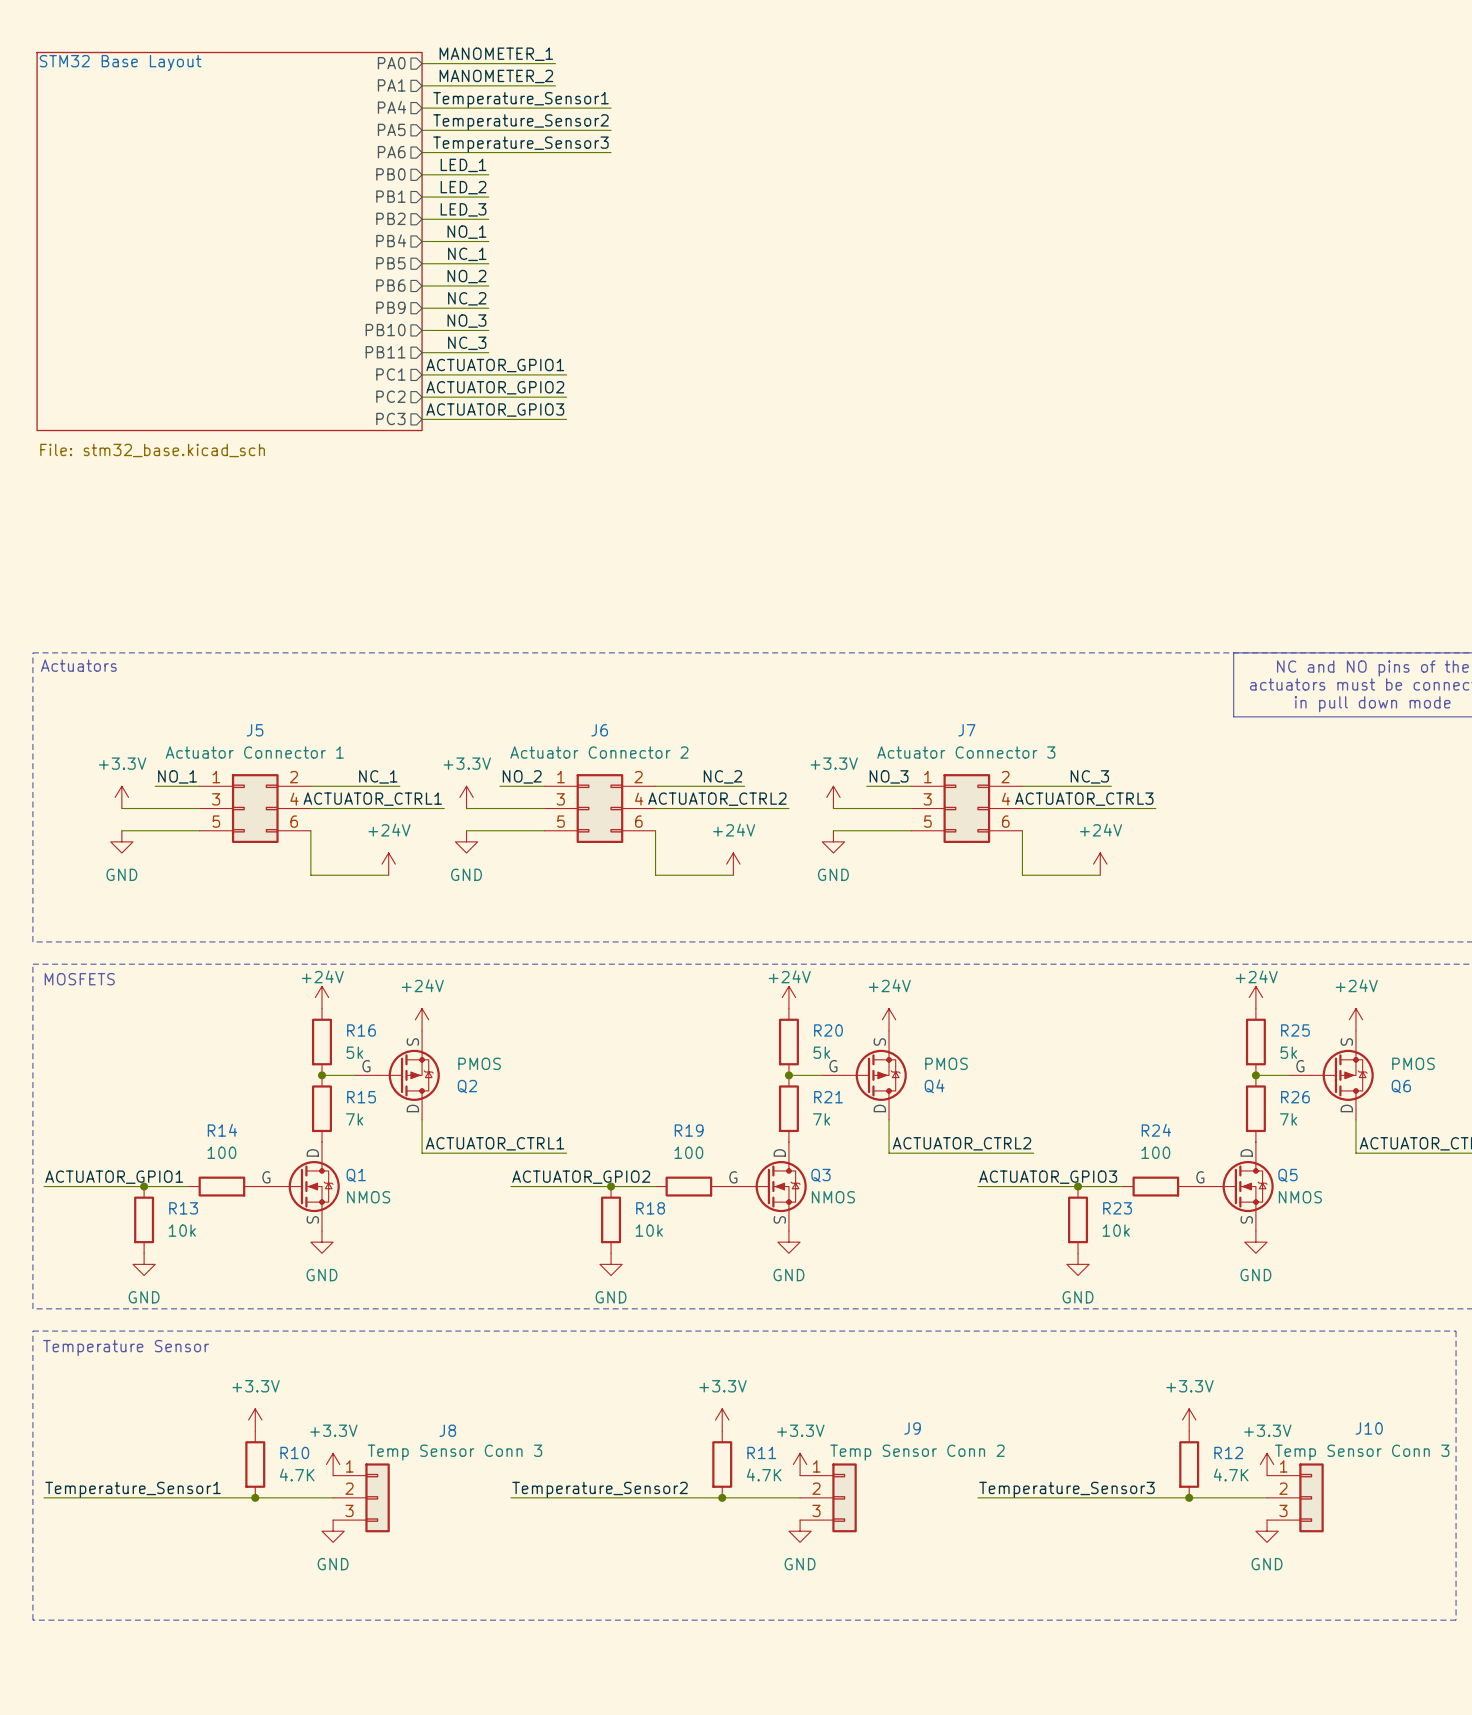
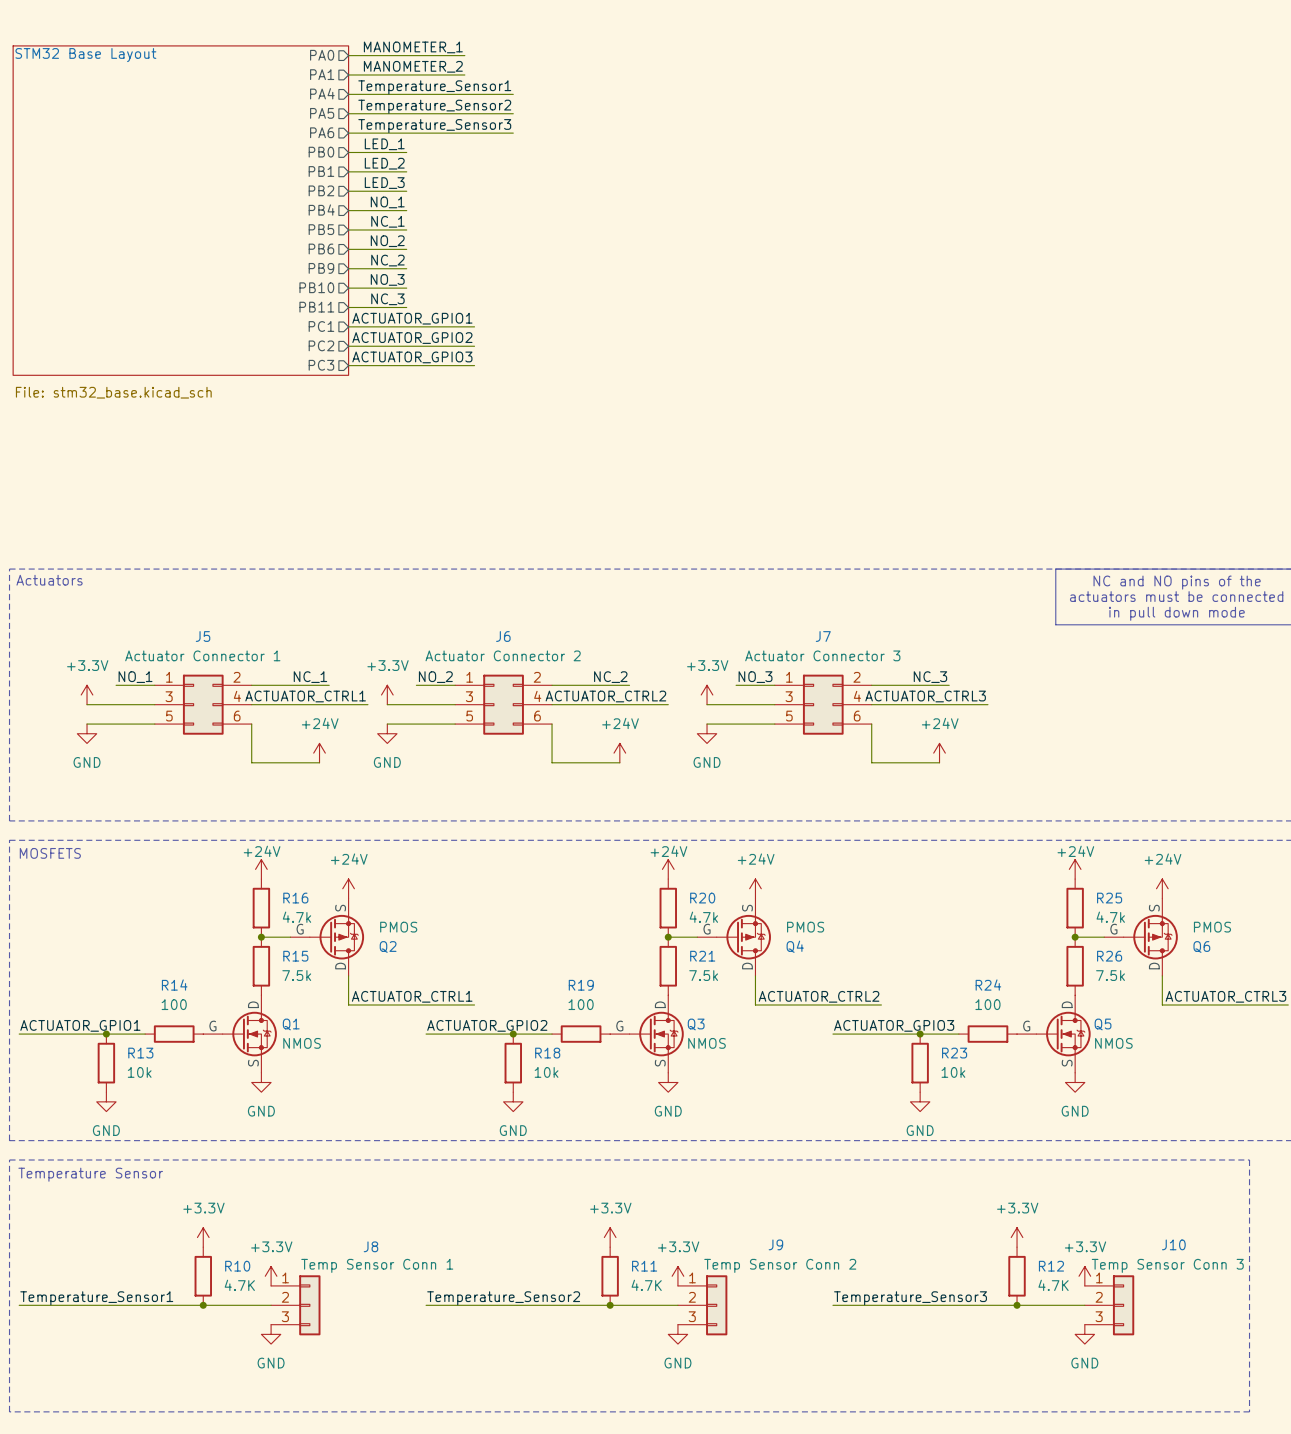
R16 value: 5k (354, 1052) -> 4.7k (296, 917)
R20 value: 5k (821, 1052) -> 4.7k (703, 917)
R25 value: 5k (1288, 1052) -> 4.7k (1110, 917)
R15 value: 7k (354, 1119) -> 7.5k (296, 975)
R21 value: 7k (821, 1119) -> 7.5k (703, 975)
R26 value: 7k (1288, 1119) -> 7.5k (1110, 975)
J8 value: Temp Sensor Conn 3 (454, 1452) -> Temp Sensor Conn 1 (377, 1265)

